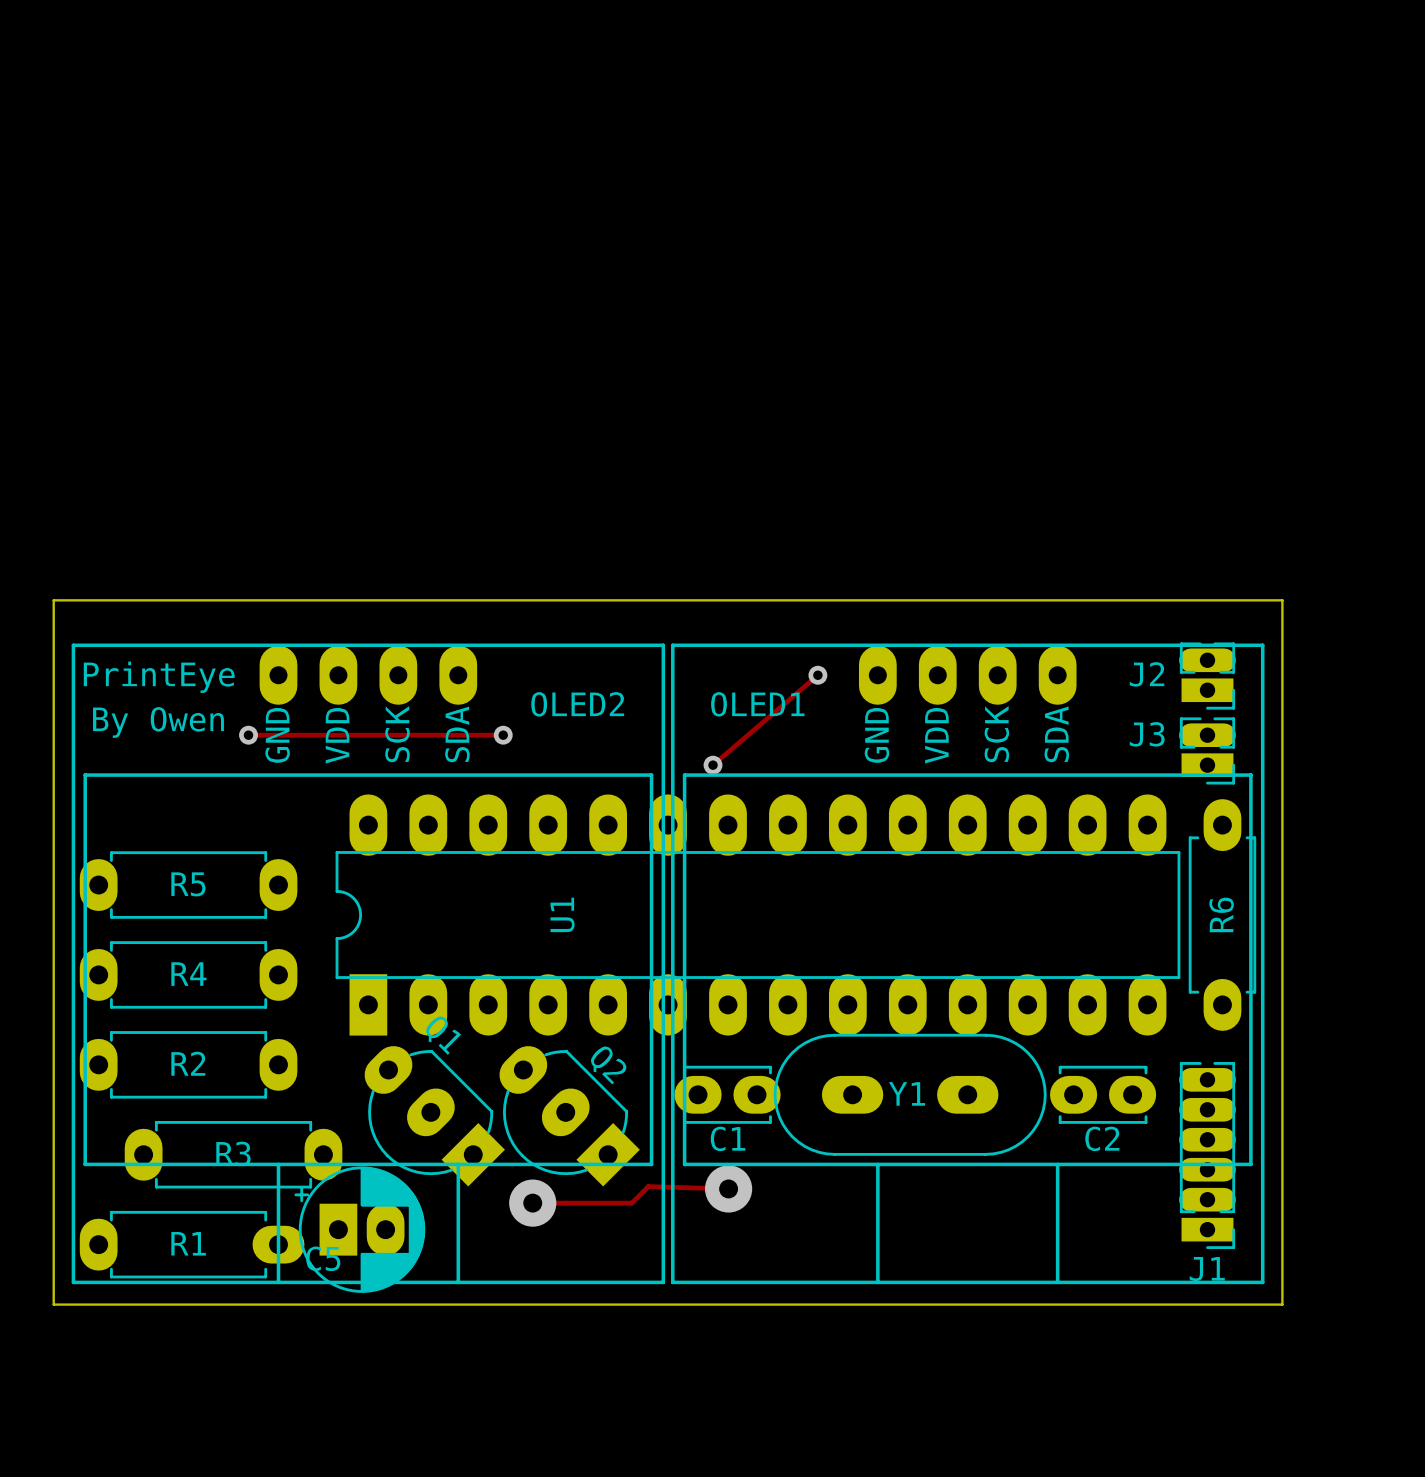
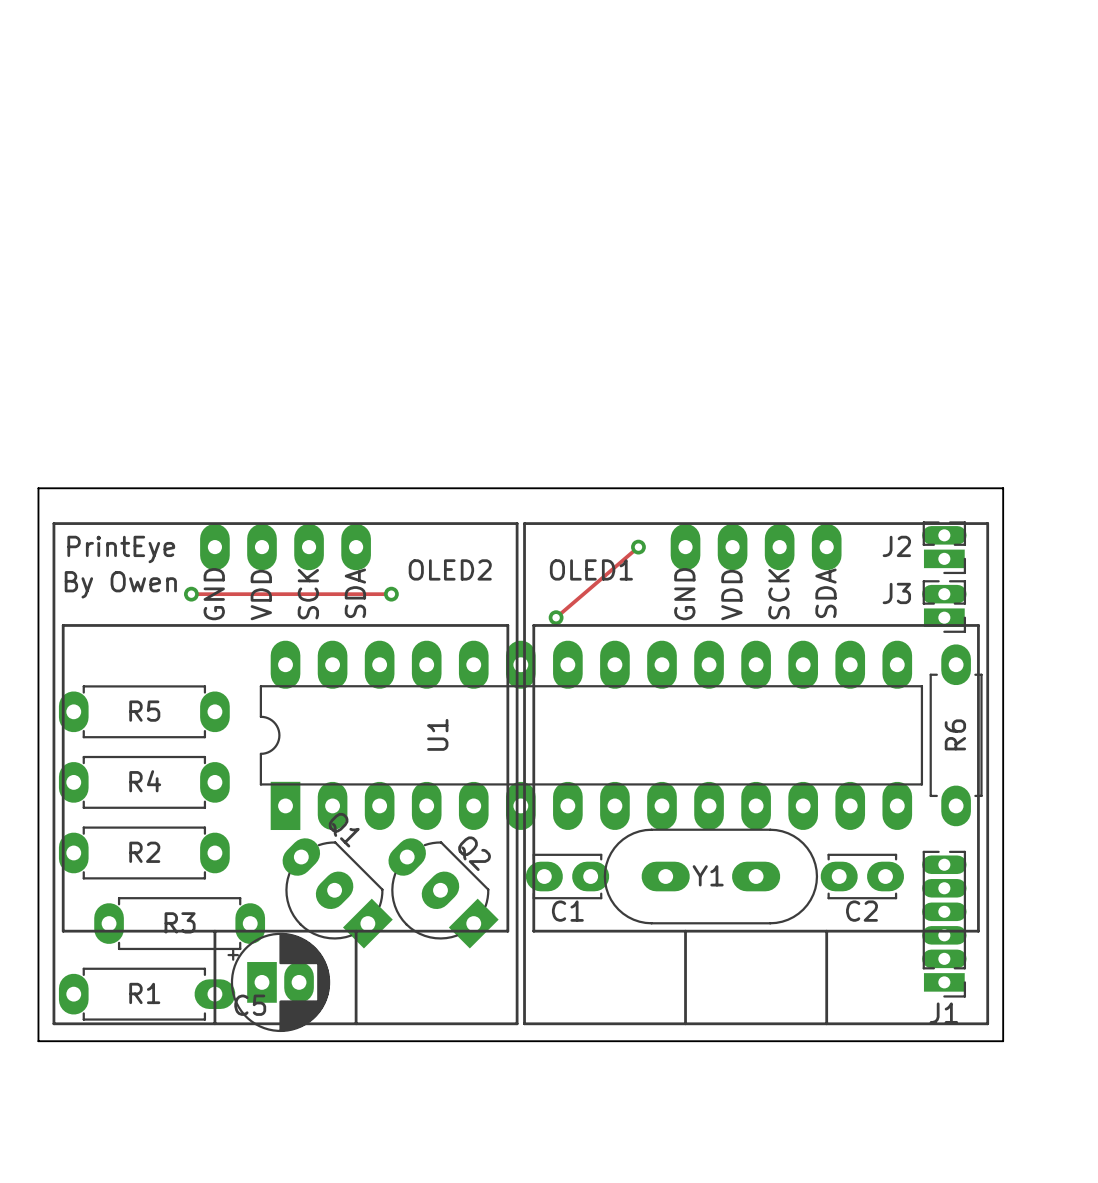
track: (728, 1188) (648, 1186) (631, 1203) (532, 1203) -> none
via: (728, 1188) -> none
via: (532, 1203) -> none

